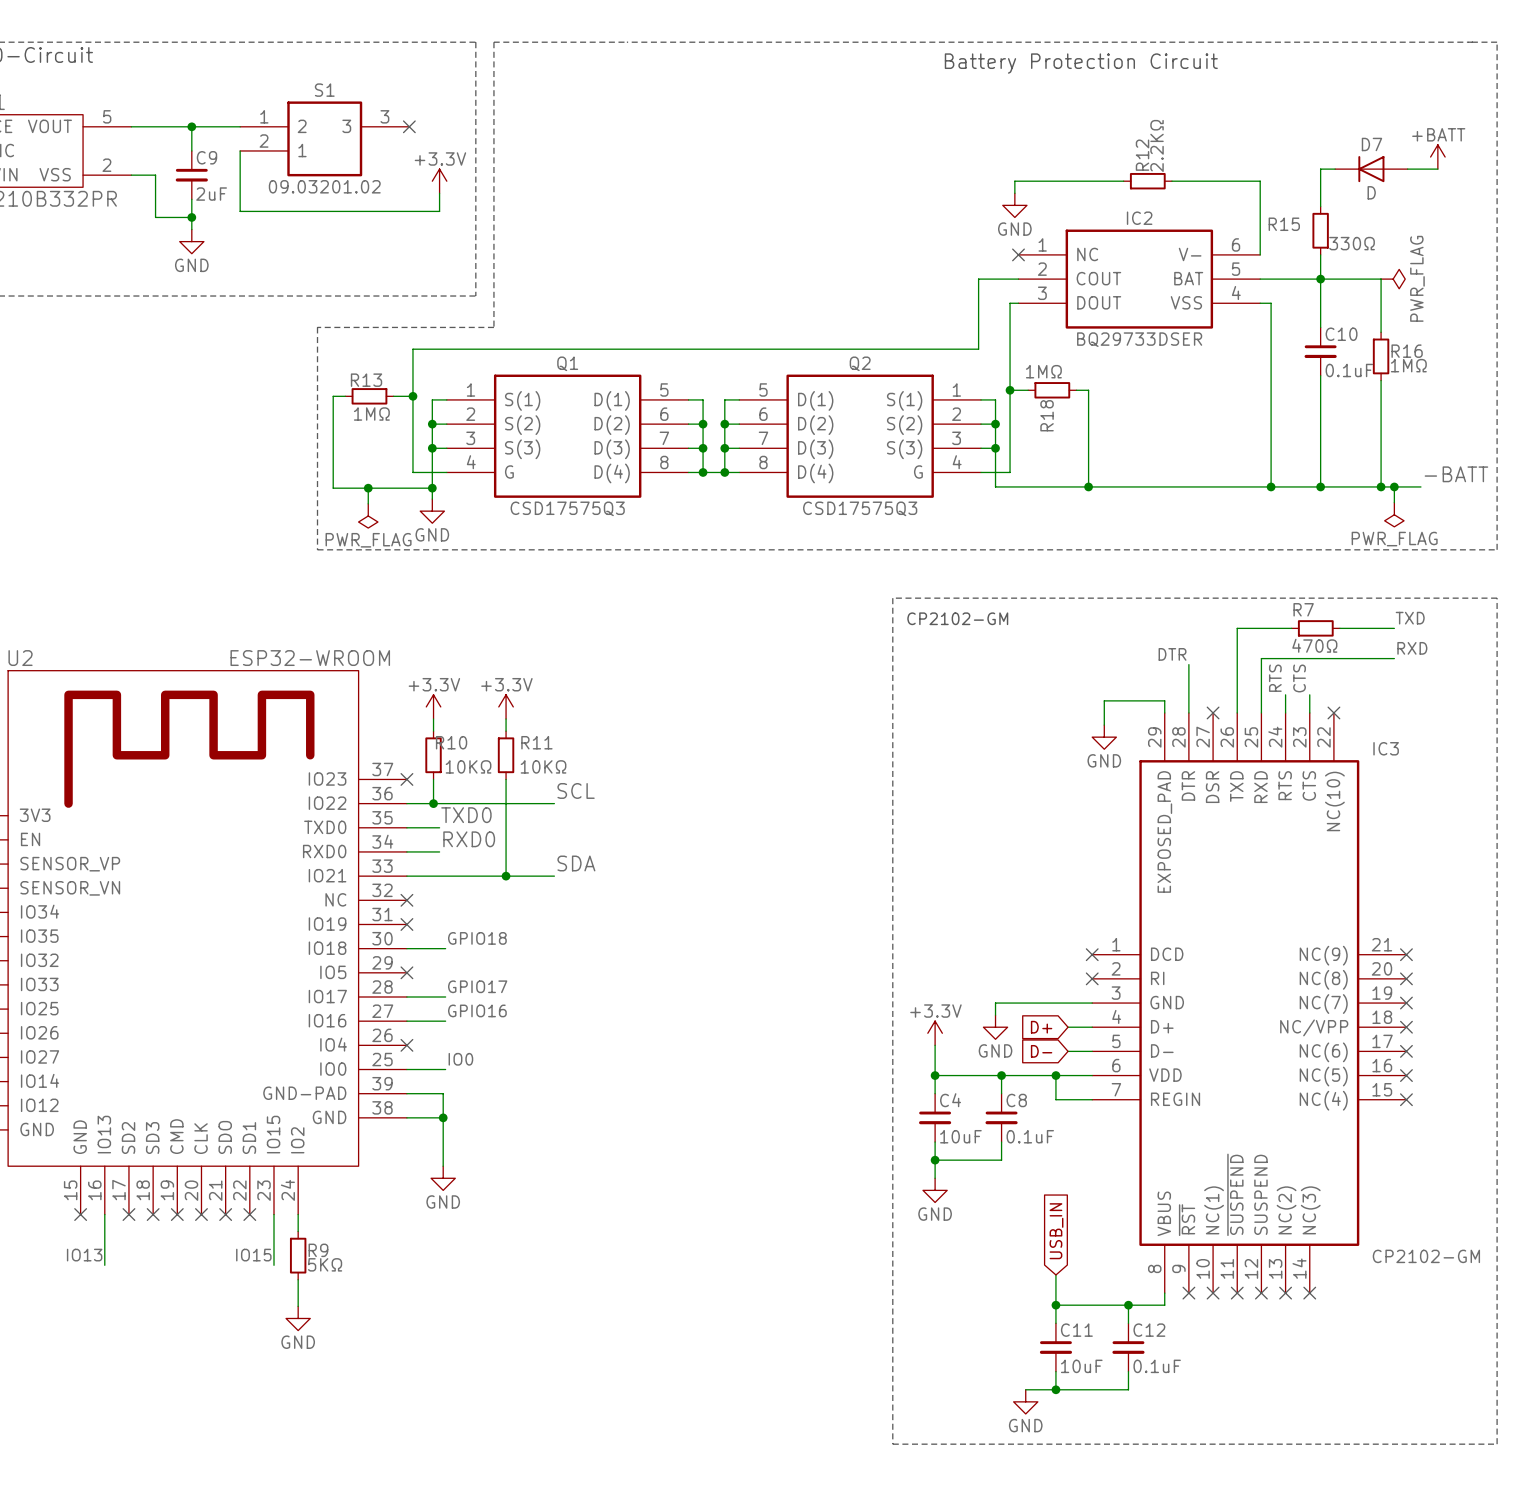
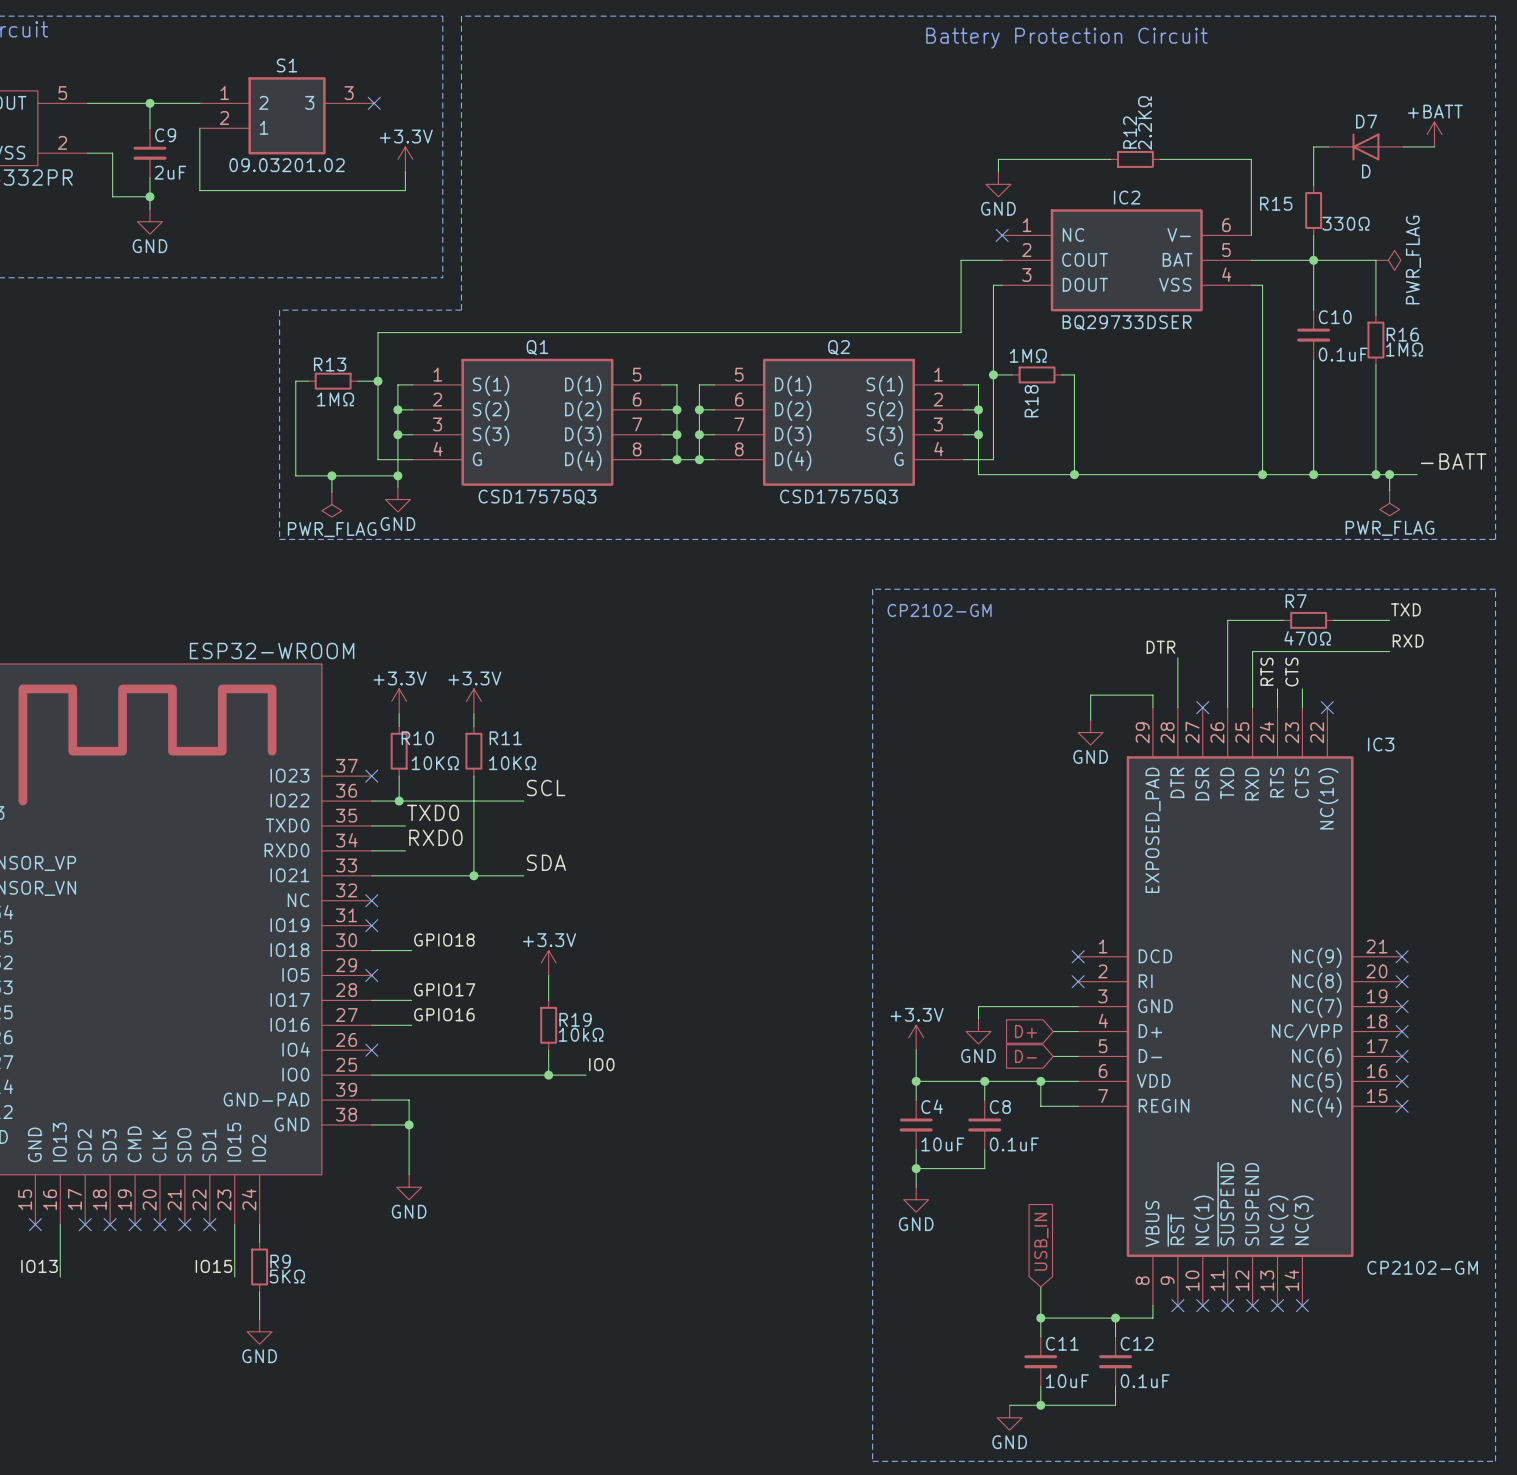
power symbol: none -> +3.3V (548, 963)
wire: none -> (548, 975) (548, 1000)
R19: none -> 10kΩ (548, 1025)
wire: none -> (548, 1050) (548, 1075)
label position: IO0 (460, 1059) -> IO0 (601, 1064)
wire: none -> (411, 1075) (586, 1075)
junction: none -> (548, 1075)

